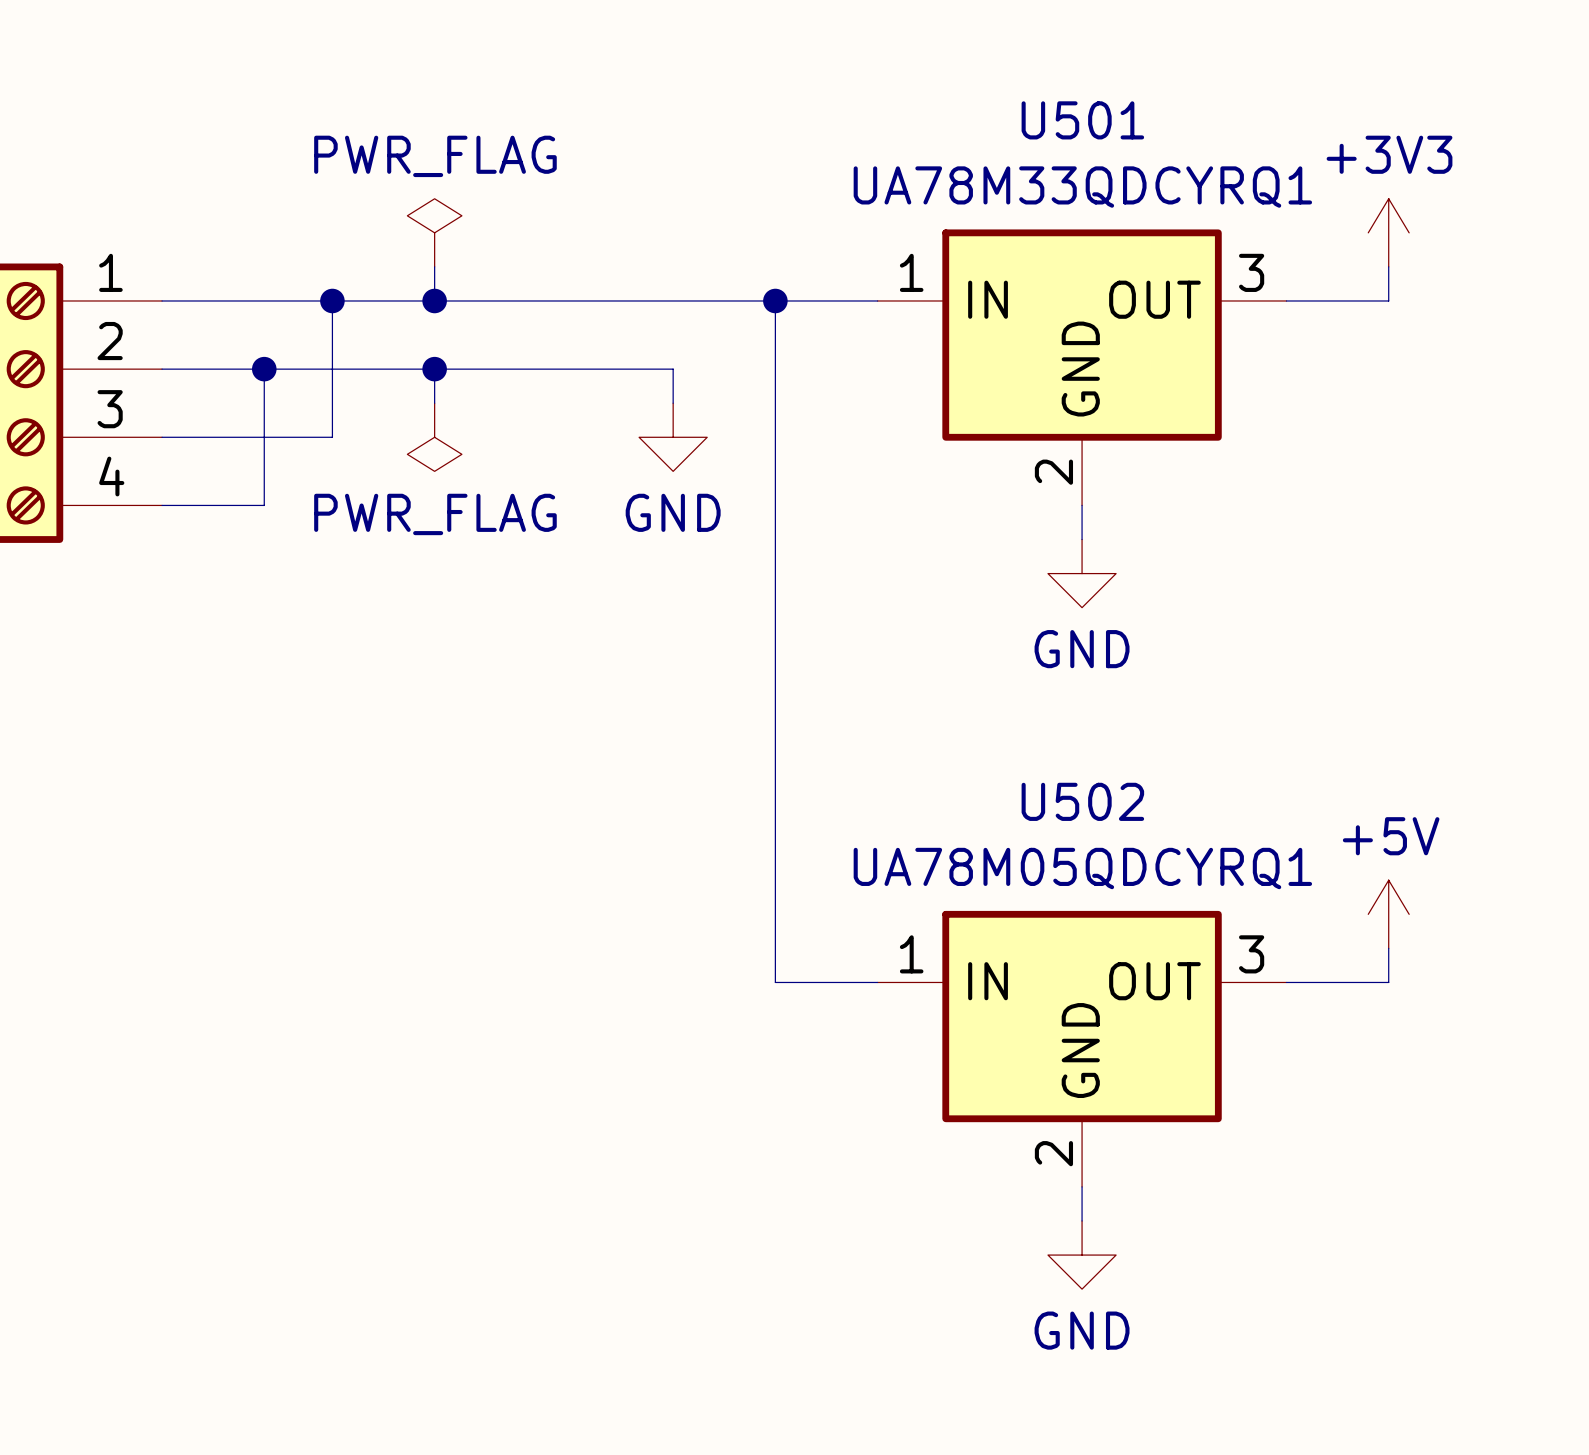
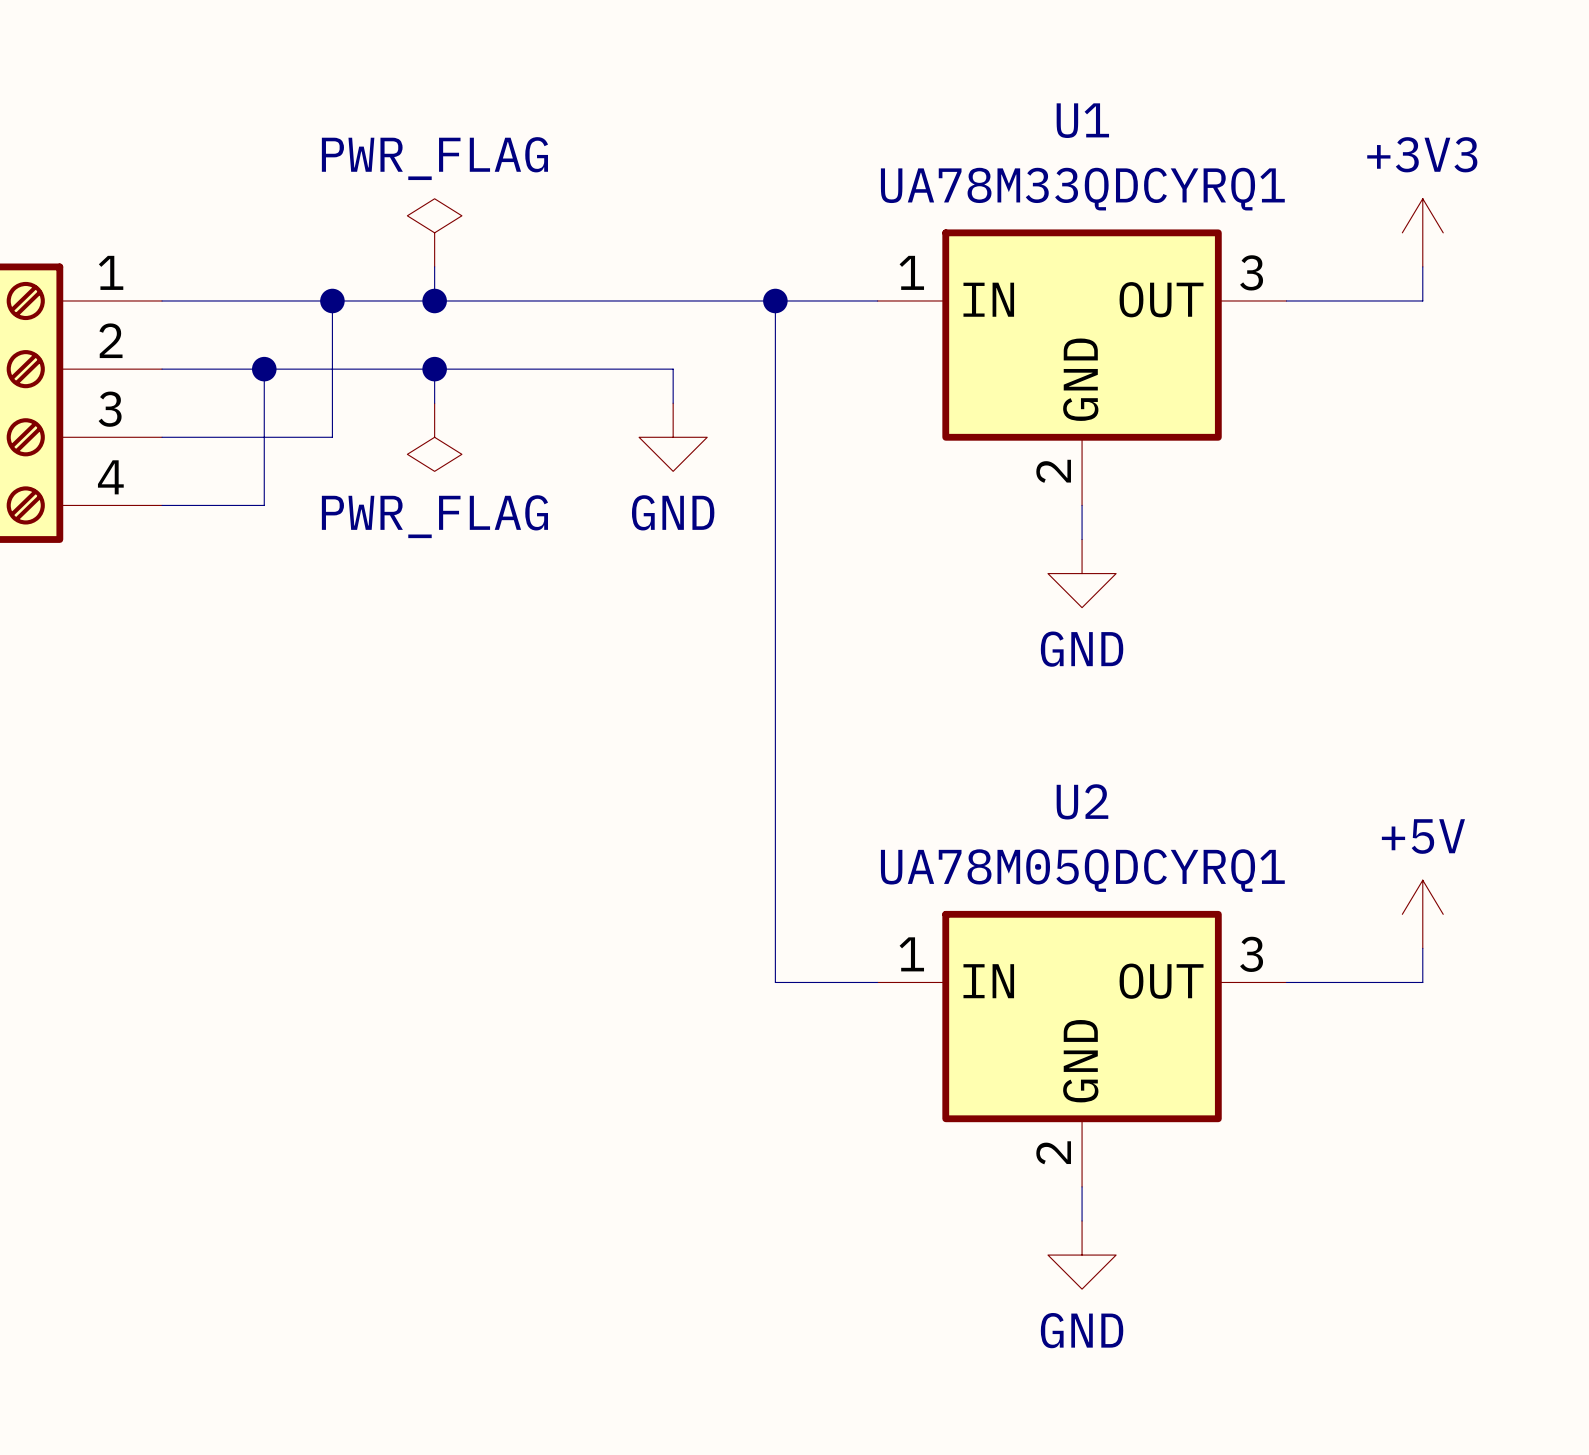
U501 name: U501 (1082, 120) -> U1 (1082, 120)
power symbol position: +3V3 (1388, 232) -> +3V3 (1422, 232)
wire: (1388, 266) (1388, 300) -> (1422, 266) (1422, 300) (1388, 300)
U502 name: U502 (1082, 801) -> U2 (1082, 801)
power symbol position: +5V (1388, 914) -> +5V (1422, 914)
wire: (1388, 948) (1388, 982) -> (1422, 948) (1422, 982) (1388, 982)

